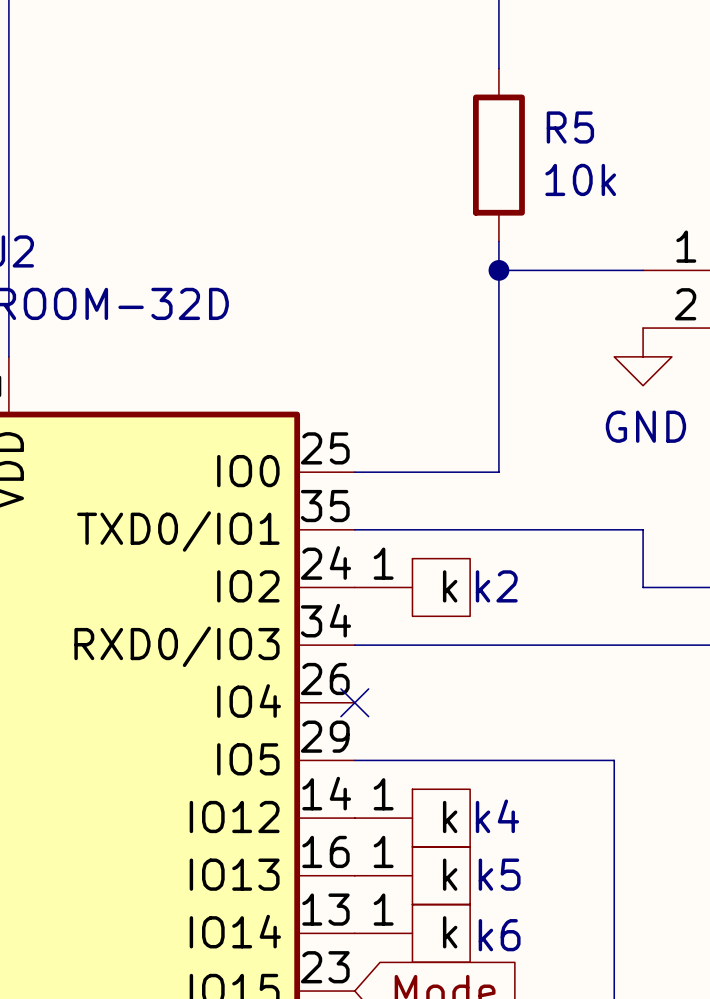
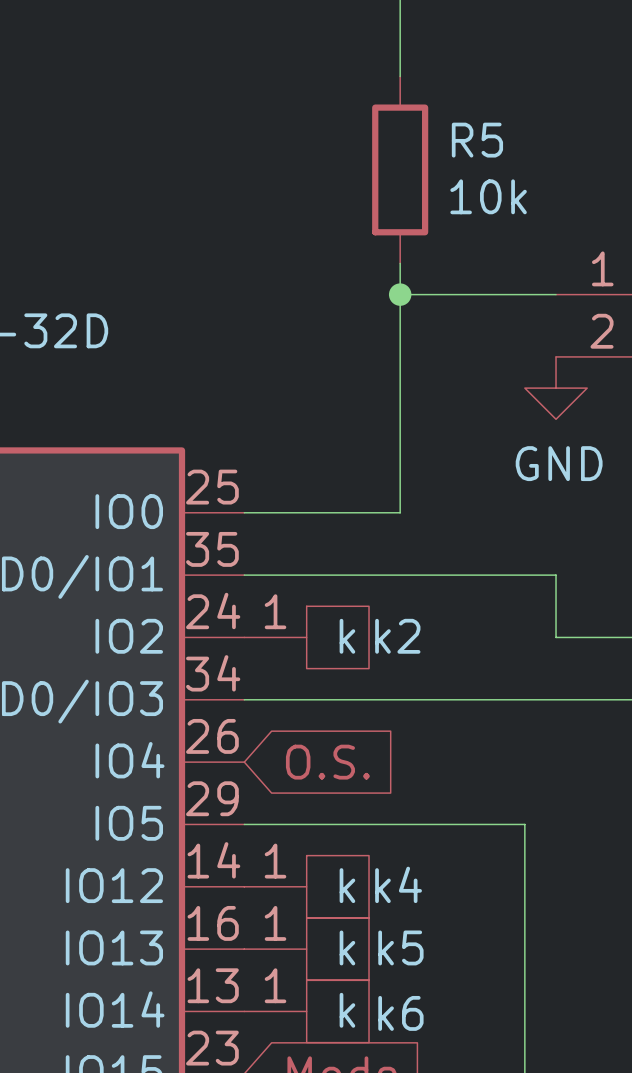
no-connect mark: (354, 702) -> none
global label: none -> O.S. (327, 762)

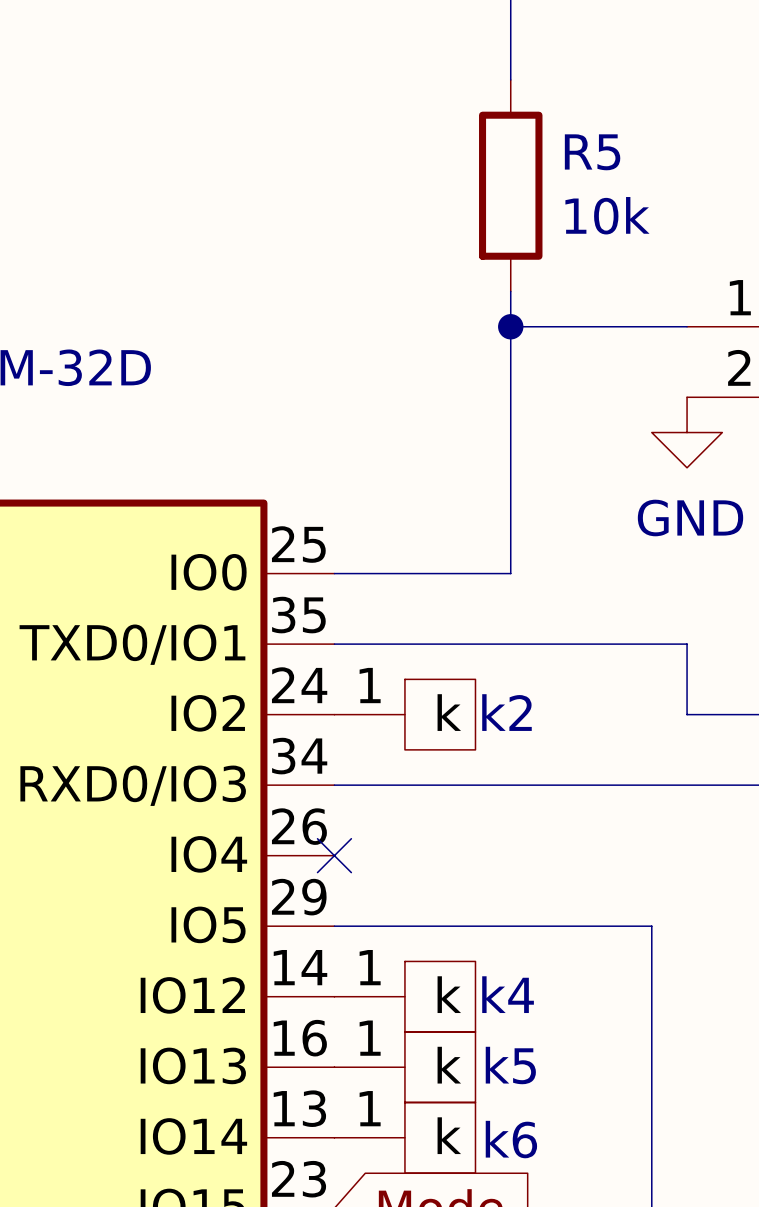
no-connect mark: none -> (334, 855)
global label: O.S. (327, 762) -> none

